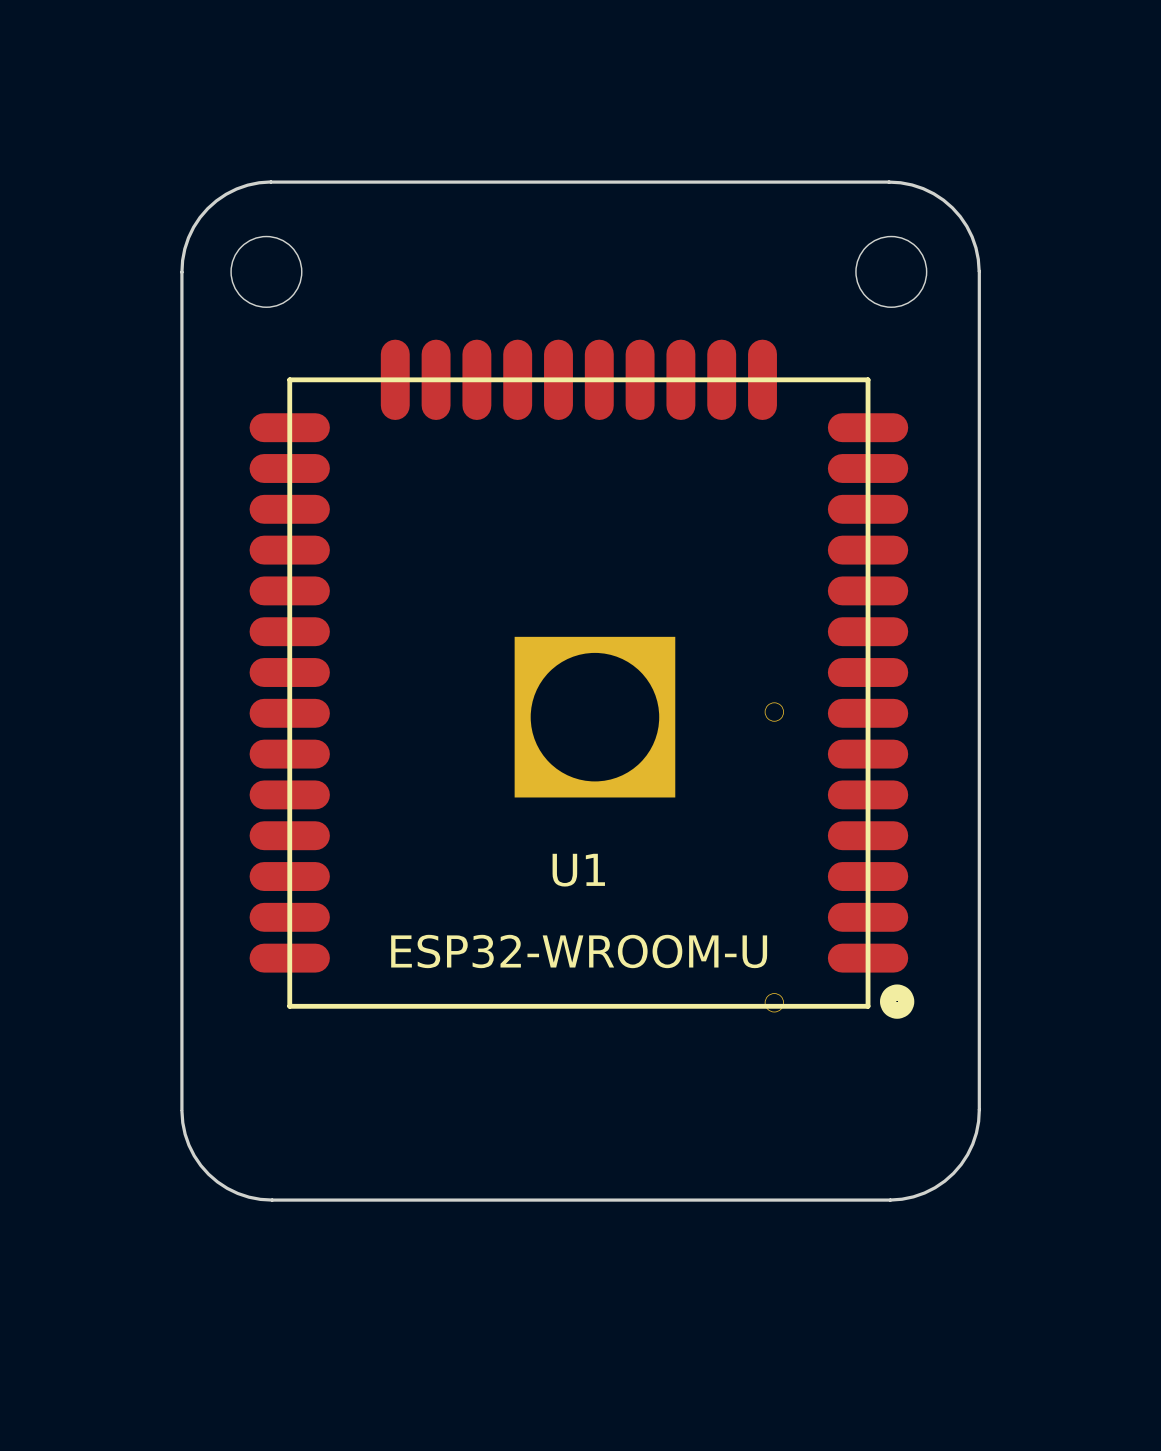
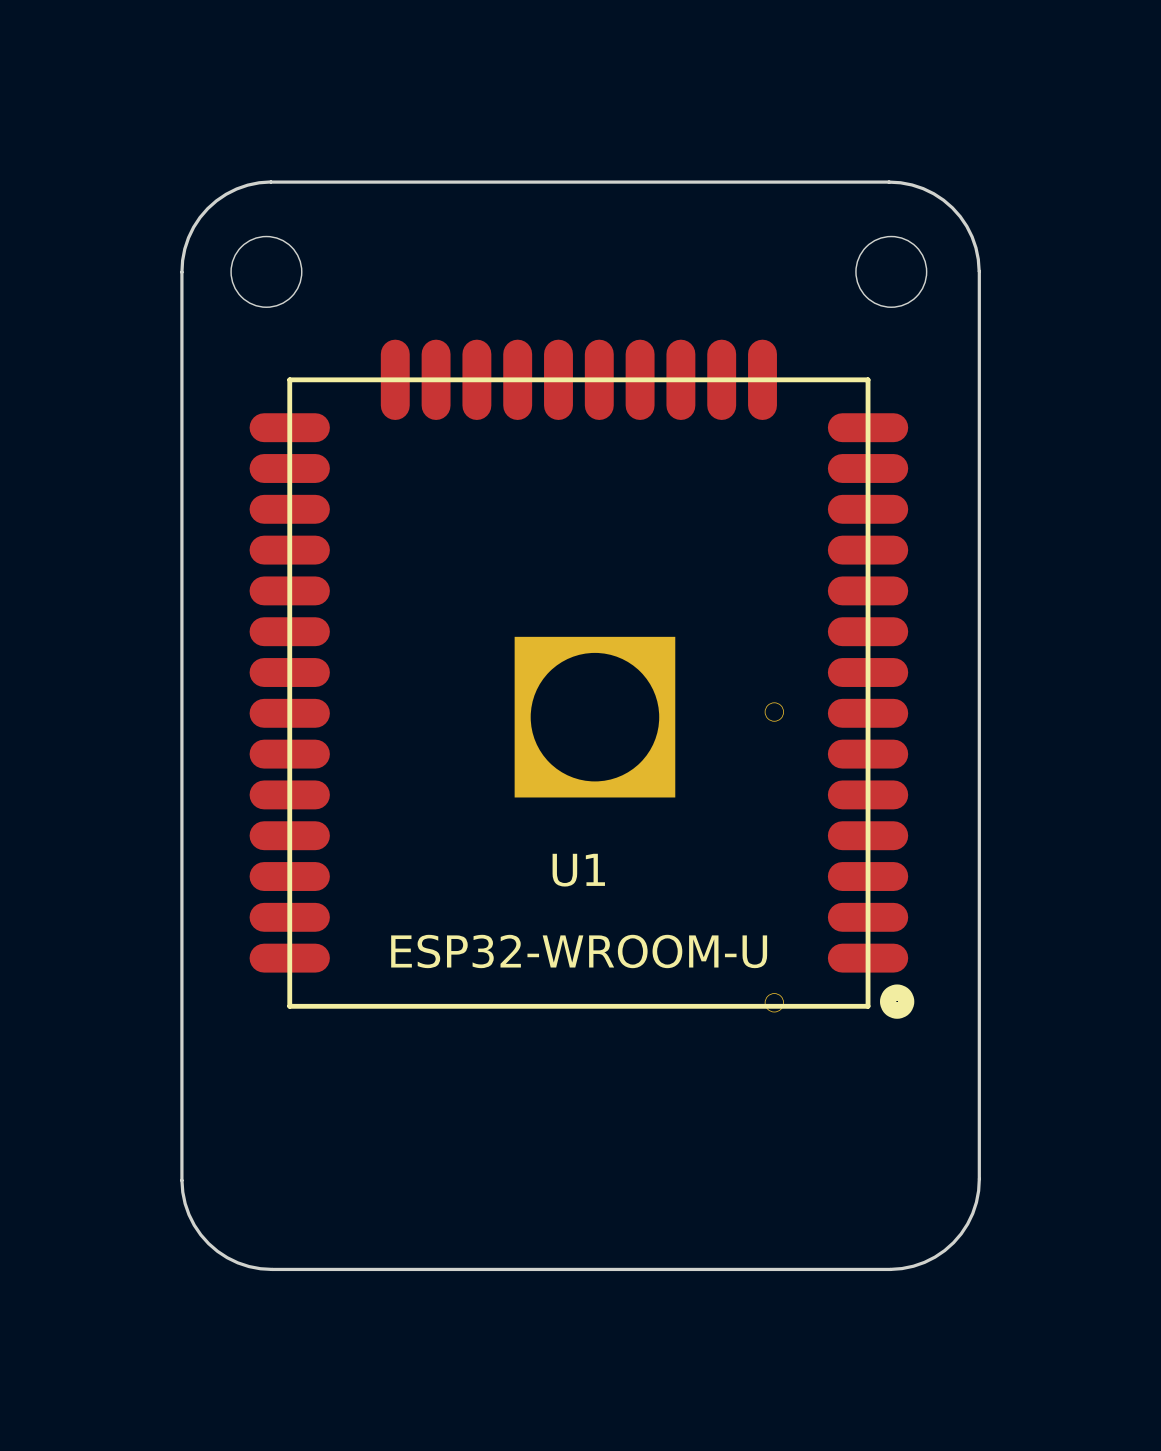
board edge: (979, 1109) (978, 1121) (972, 1144) (961, 1164) (953, 1173) (944, 1181) (924, 1193) (913, 1196) (890, 1200) (260, 1199) (248, 1197) (227, 1188) (208, 1174) (200, 1165) (188, 1145) (185, 1134) (181, 1111) -> (979, 1179) (978, 1190) (972, 1213) (961, 1233) (944, 1250) (935, 1257) (913, 1266) (902, 1268) (260, 1268) (237, 1262) (217, 1251) (200, 1234) (188, 1214) (185, 1203) (181, 1180) (181, 1109)
board edge: none -> (979, 1109) (979, 1178)

